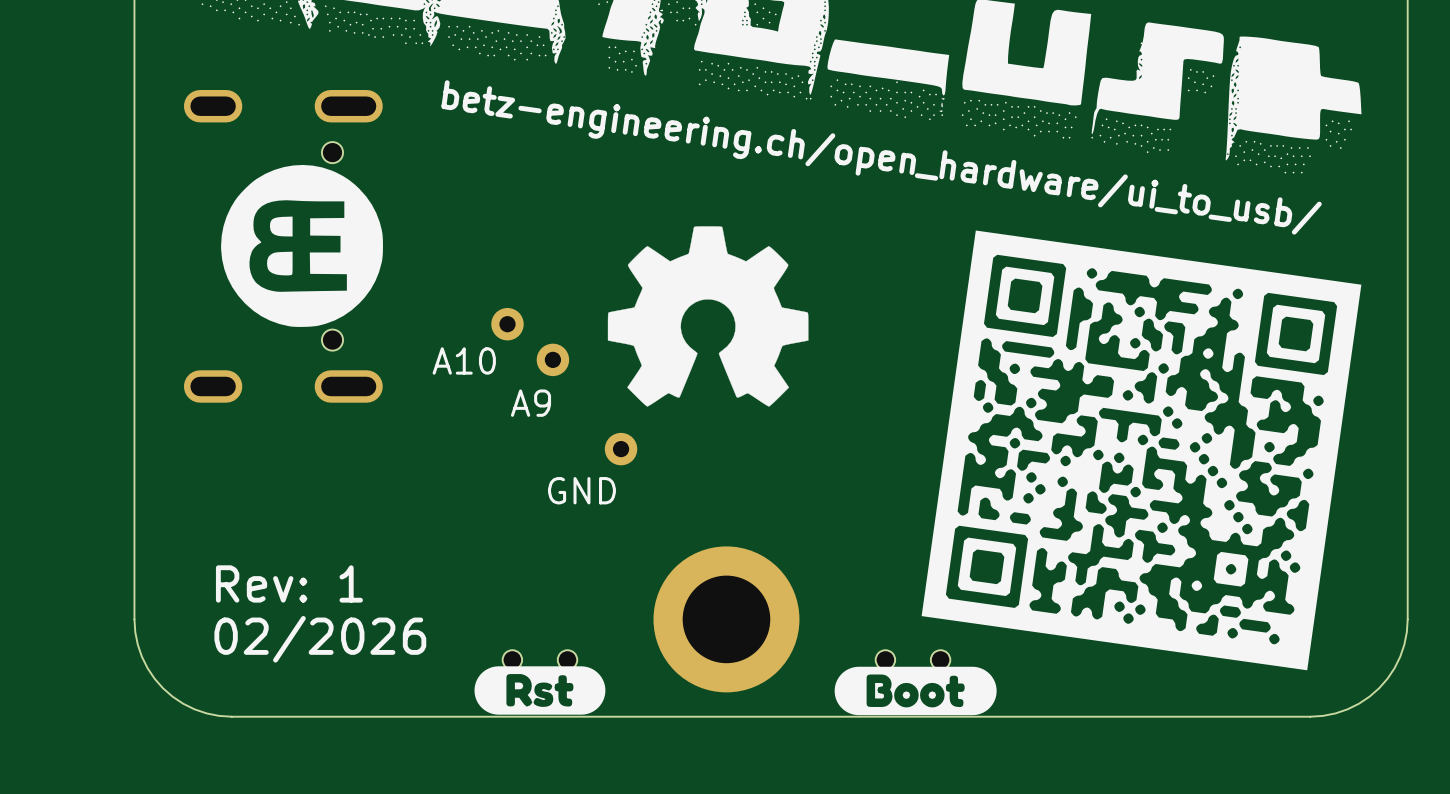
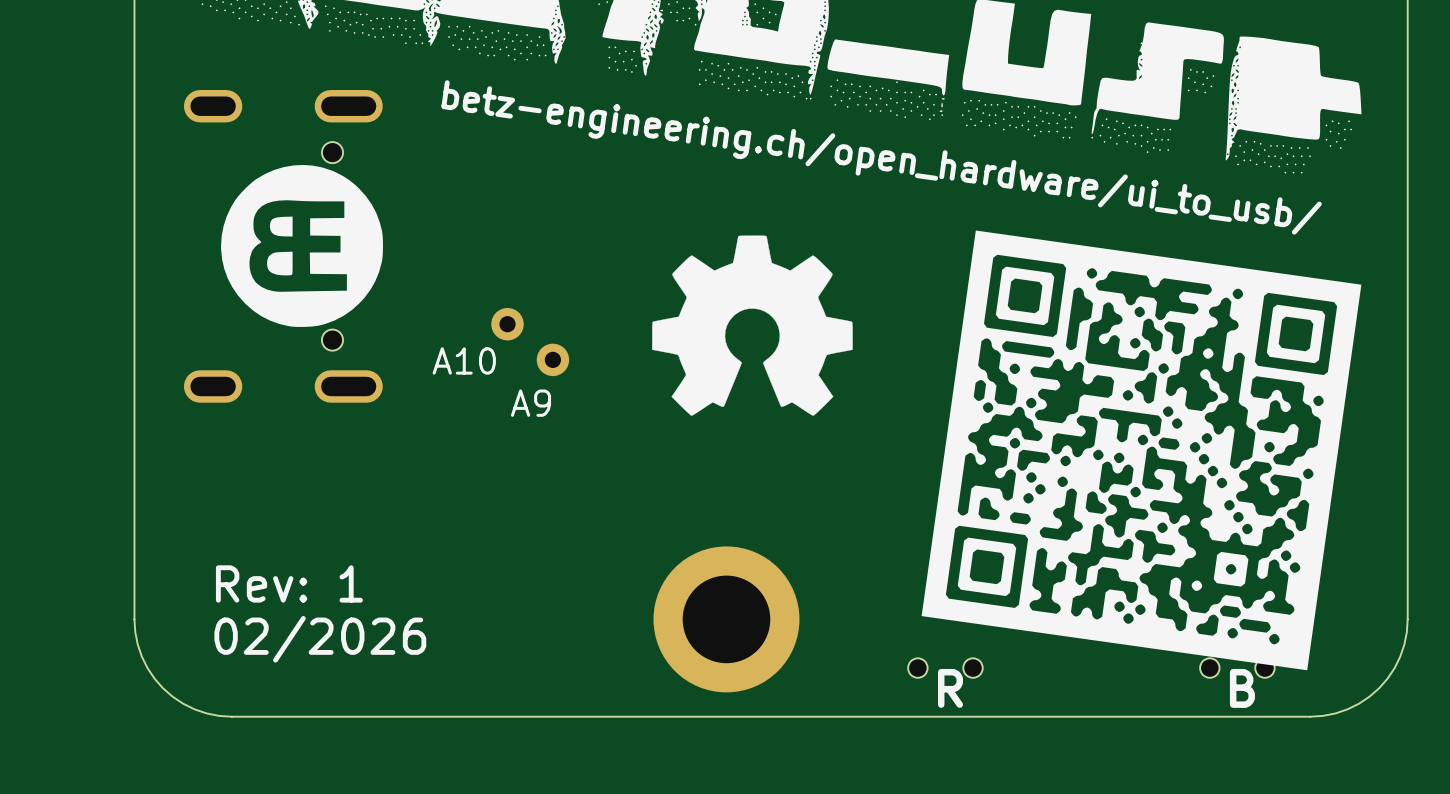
drawing position: (708, 316) -> (752, 325)
part: (621, 449) -> none
text: GND (581, 490) -> none
part: (539, 659) -> none
part position: (913, 659) -> (945, 668)
drawing: [474, 666, 606, 715] -> none
drawing: [834, 666, 997, 716] -> none
part: none -> (1237, 668)
text: none -> R (950, 688)
text: none -> B (1242, 688)

